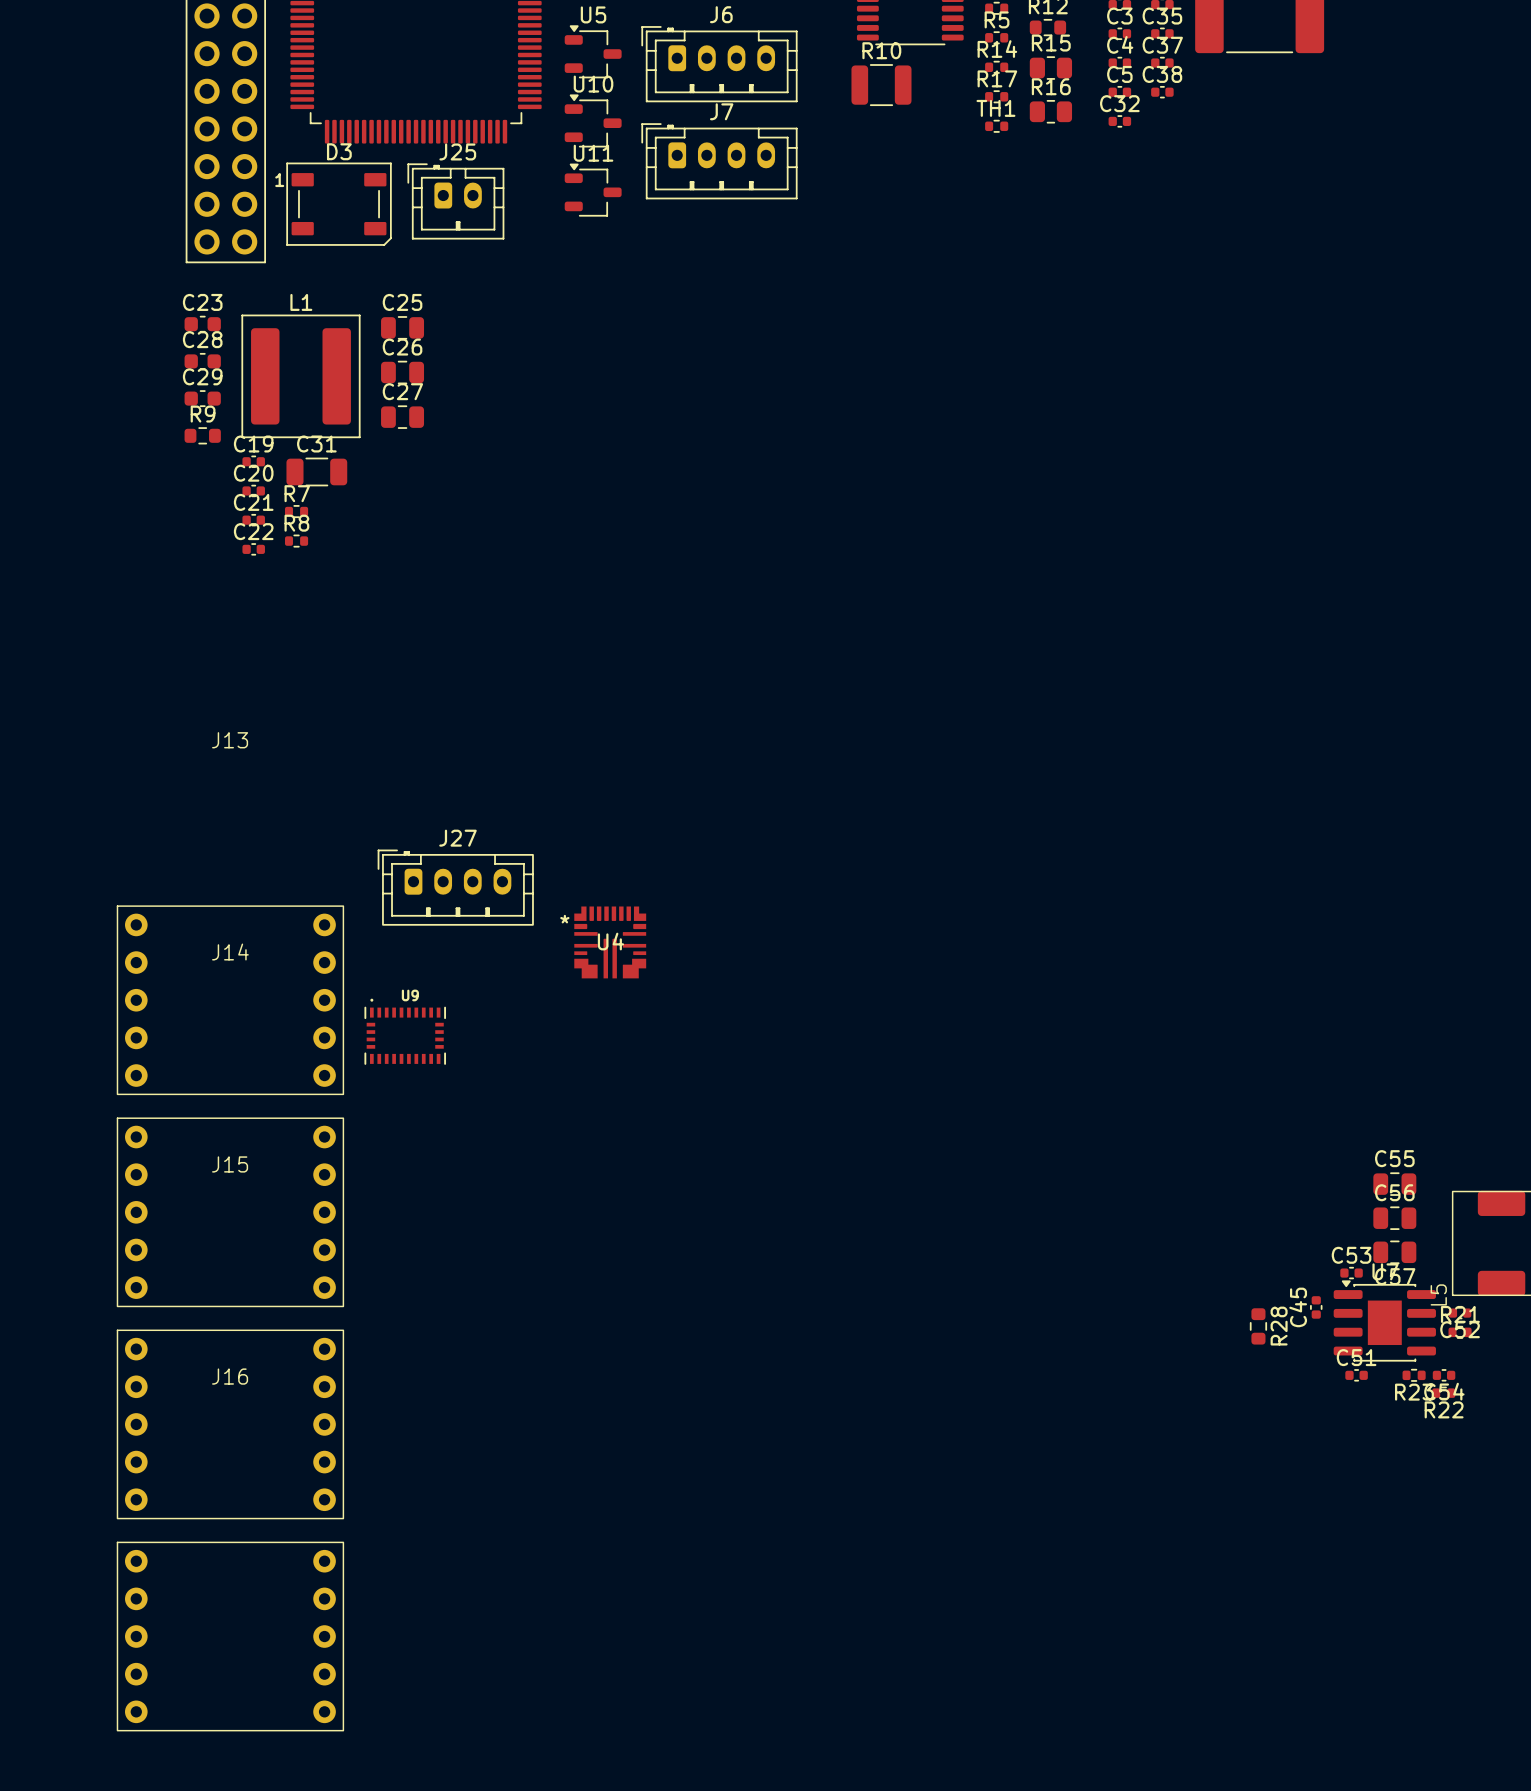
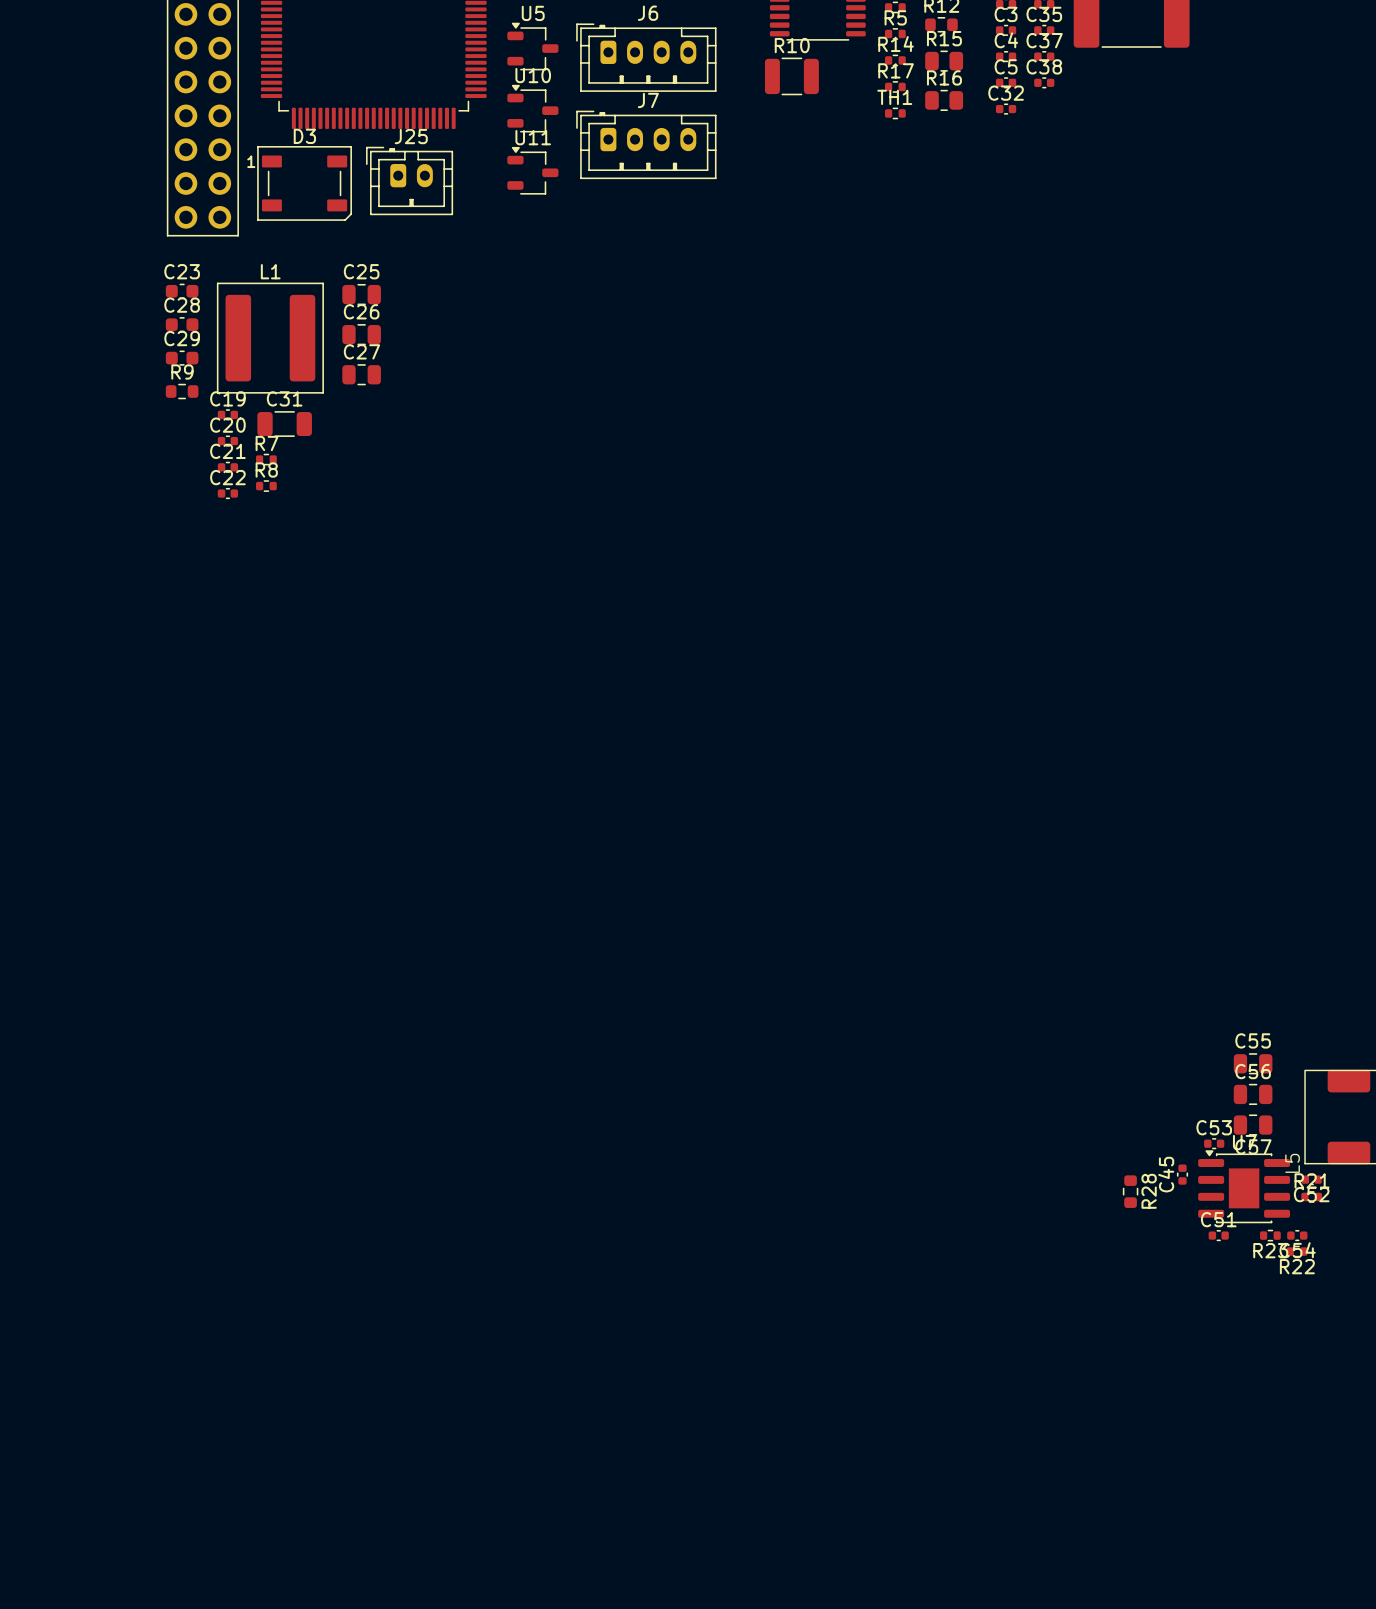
J27: (455, 887) -> none
U4: (610, 942) -> none
J13: (230, 1000) -> none
U9: (405, 1031) -> none
J14: (230, 1212) -> none
J15: (230, 1424) -> none
J16: (230, 1636) -> none

